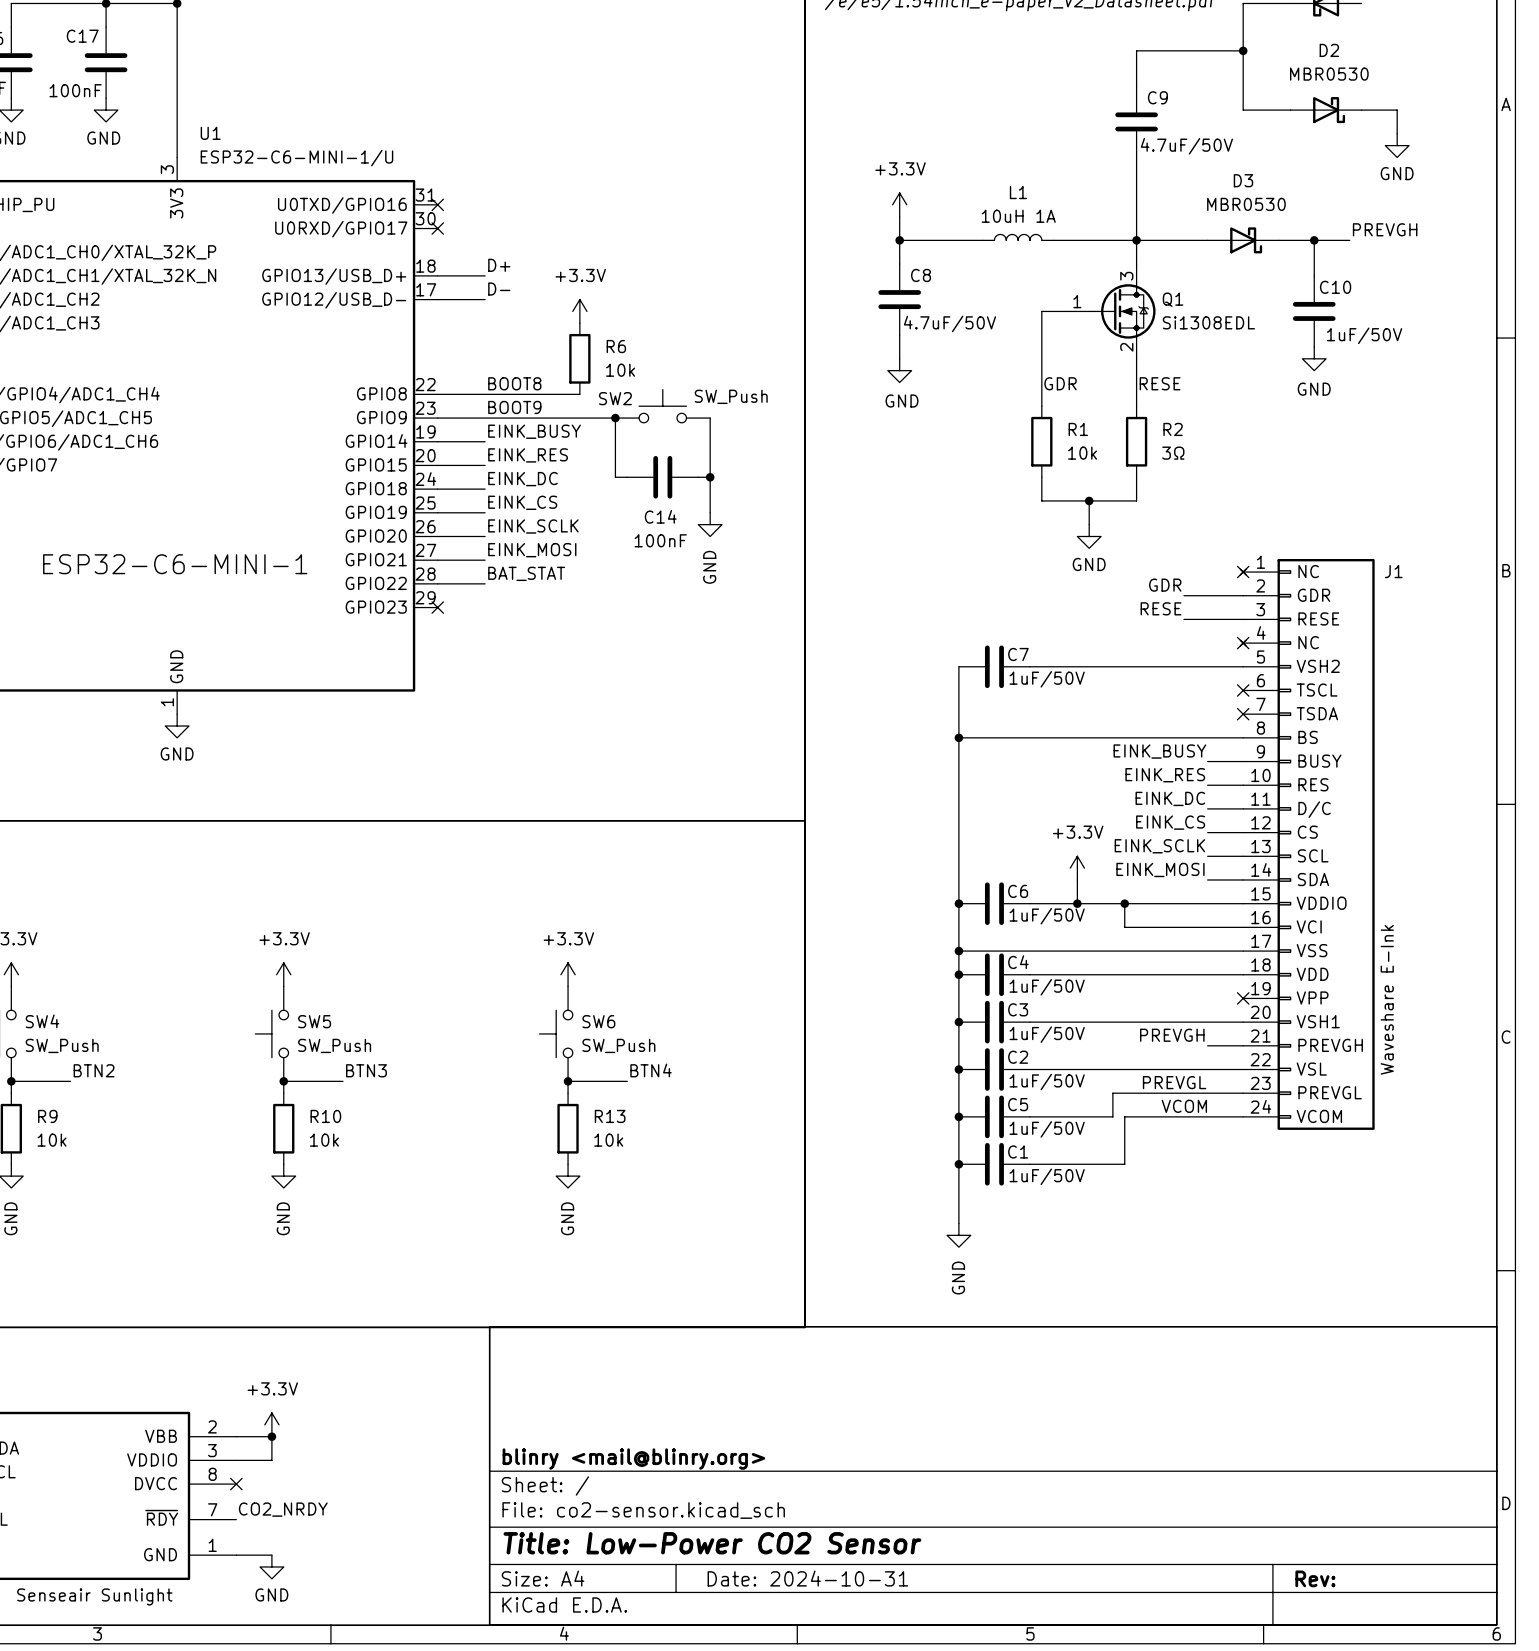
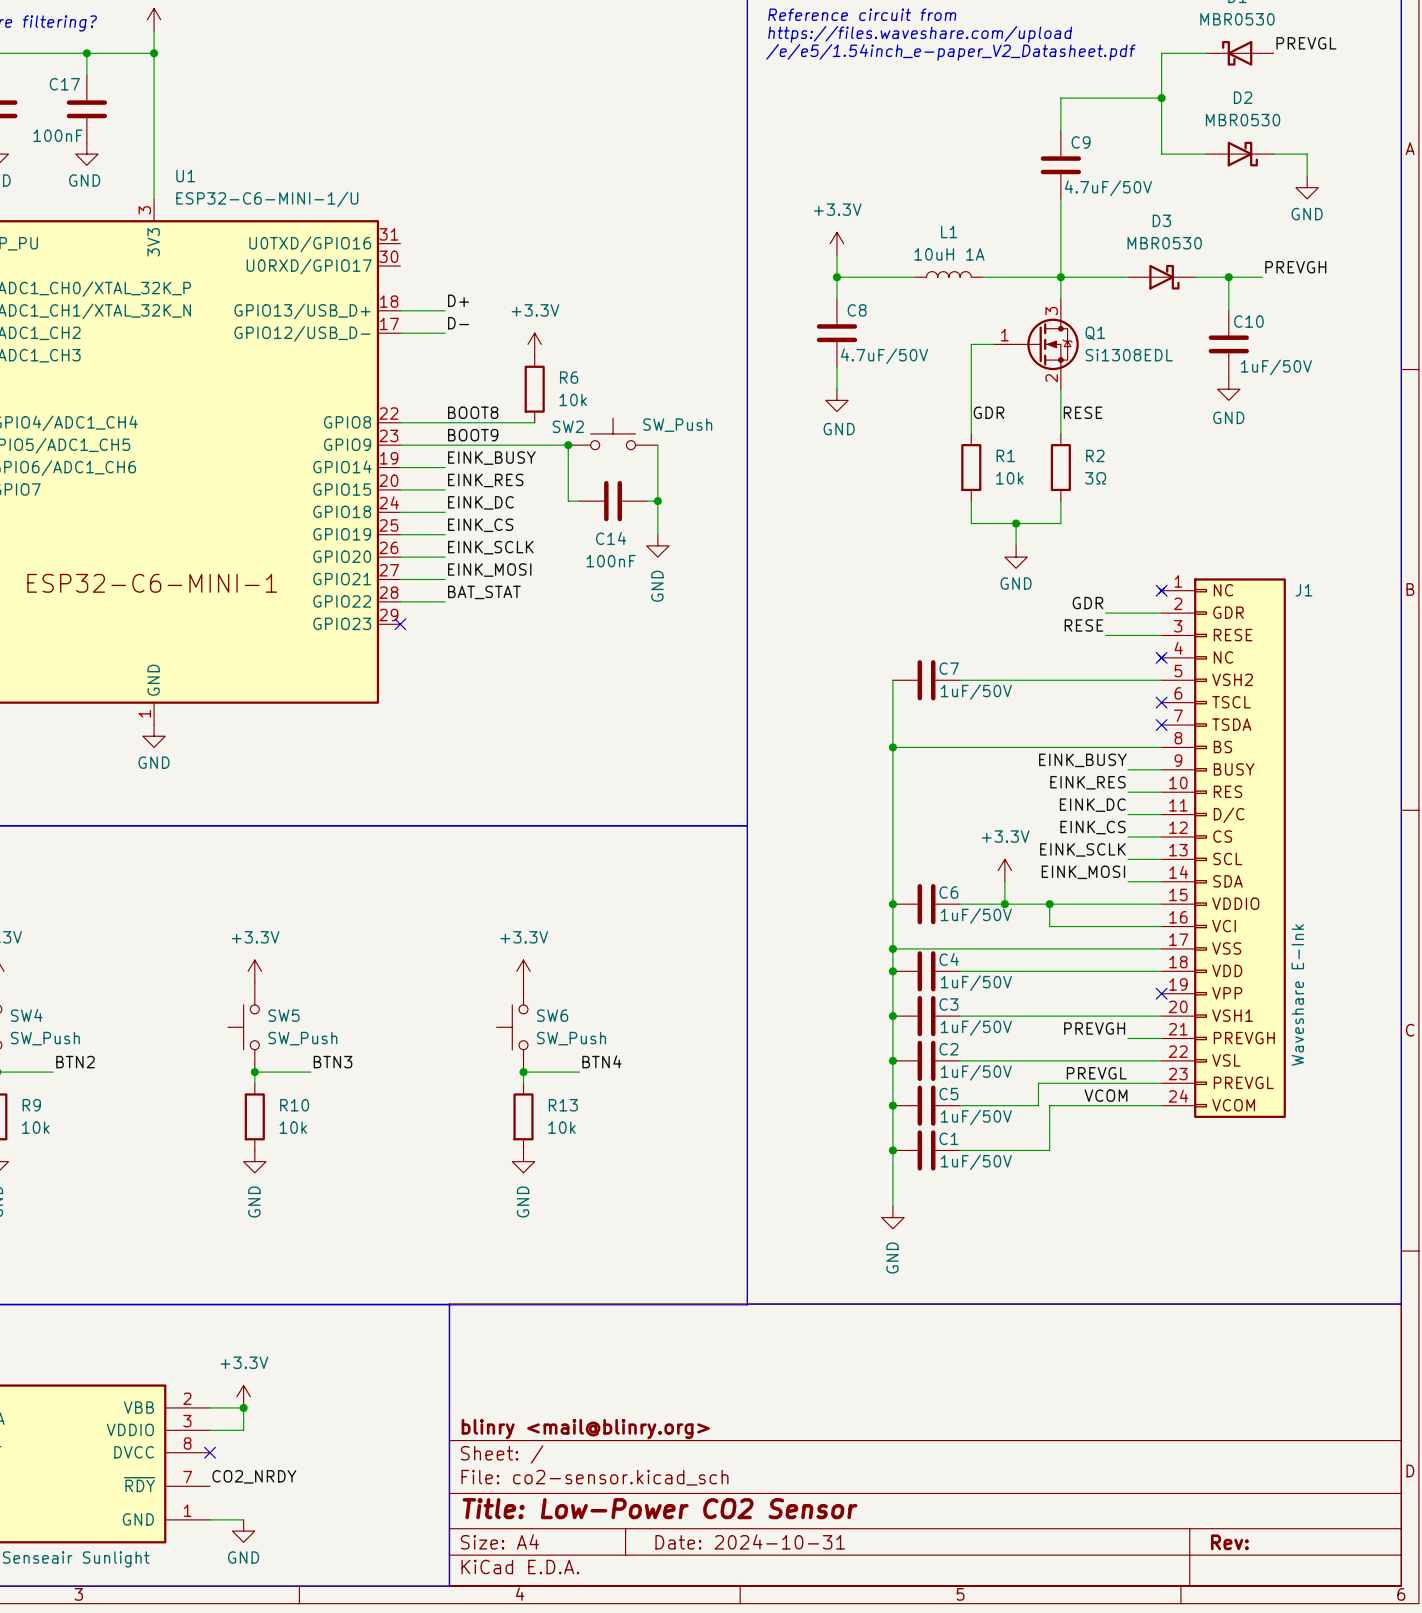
no-connect mark: (437, 204) -> none
no-connect mark: (437, 228) -> none

